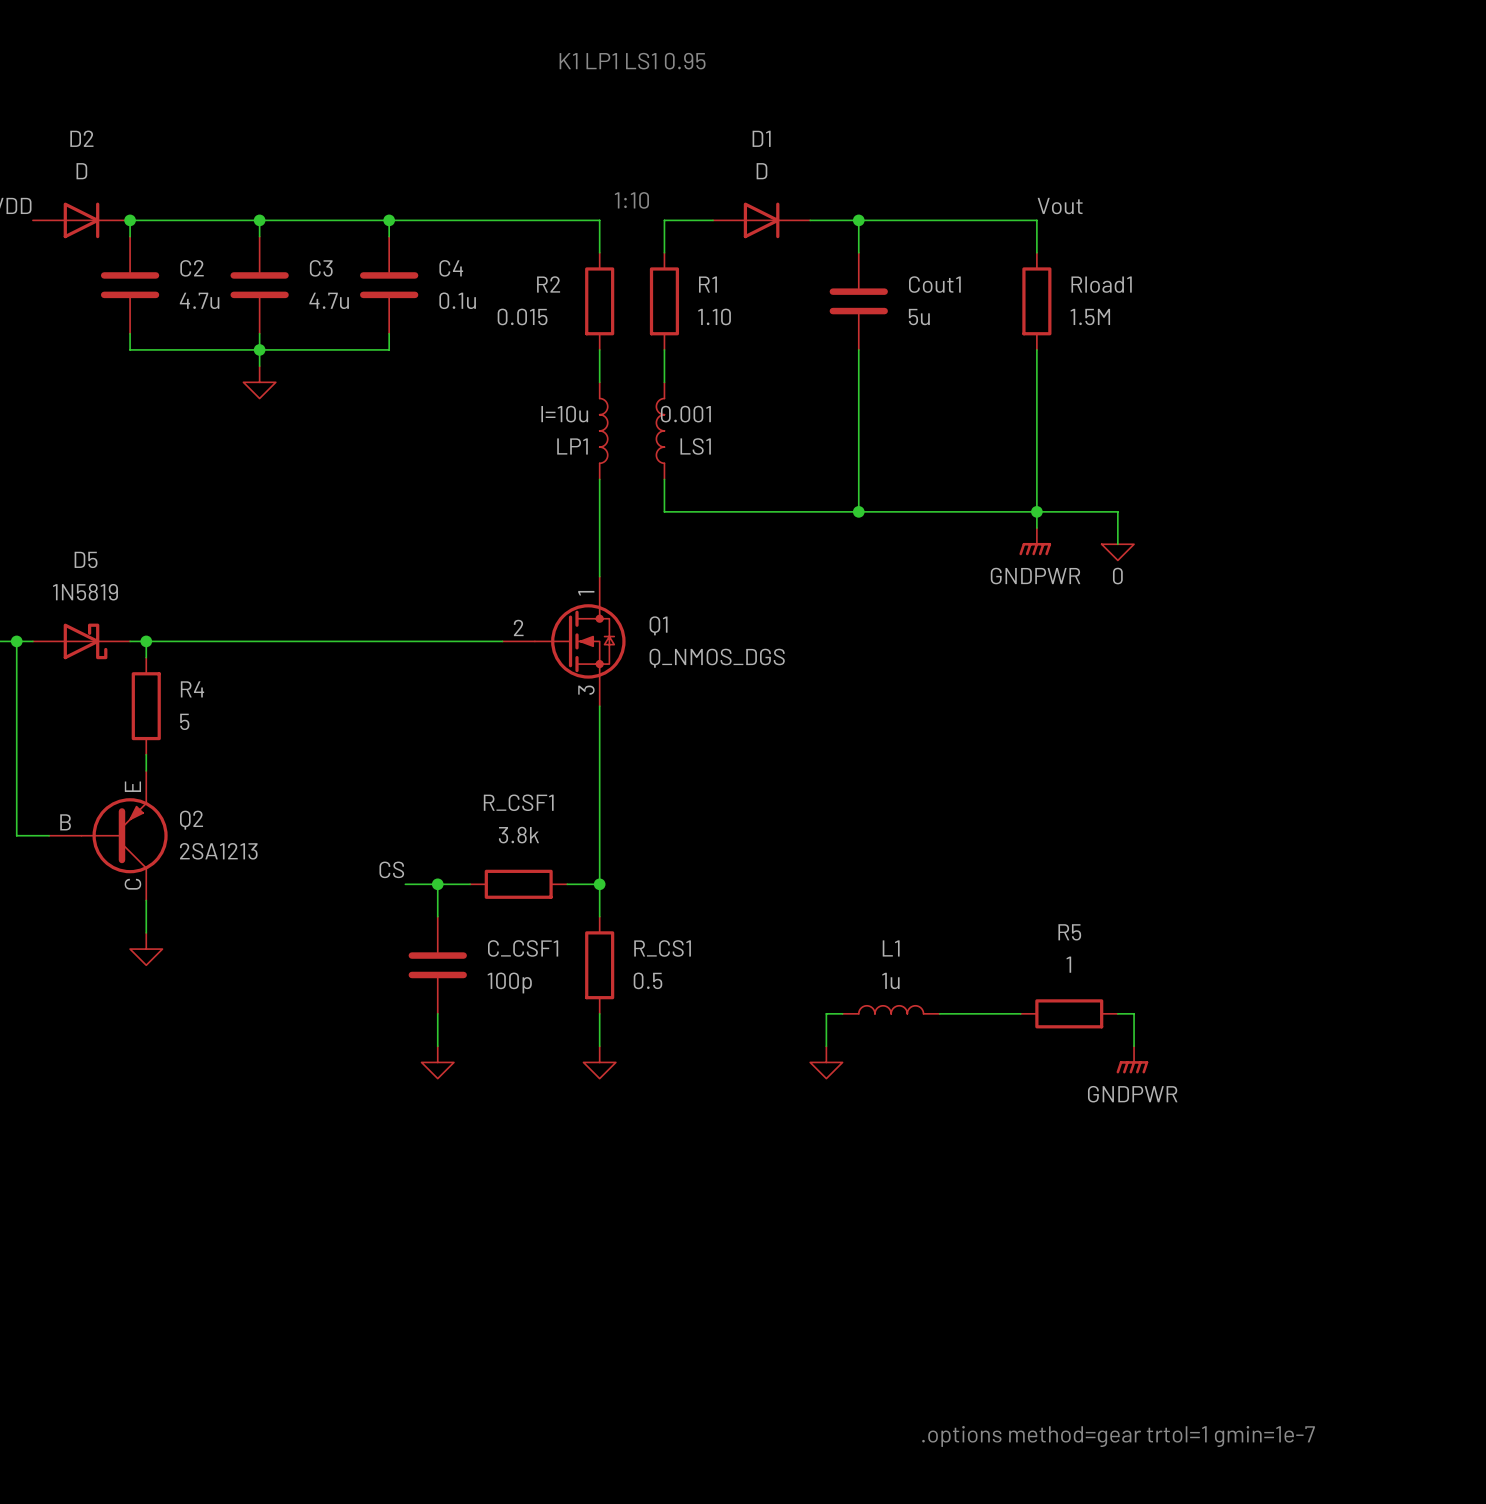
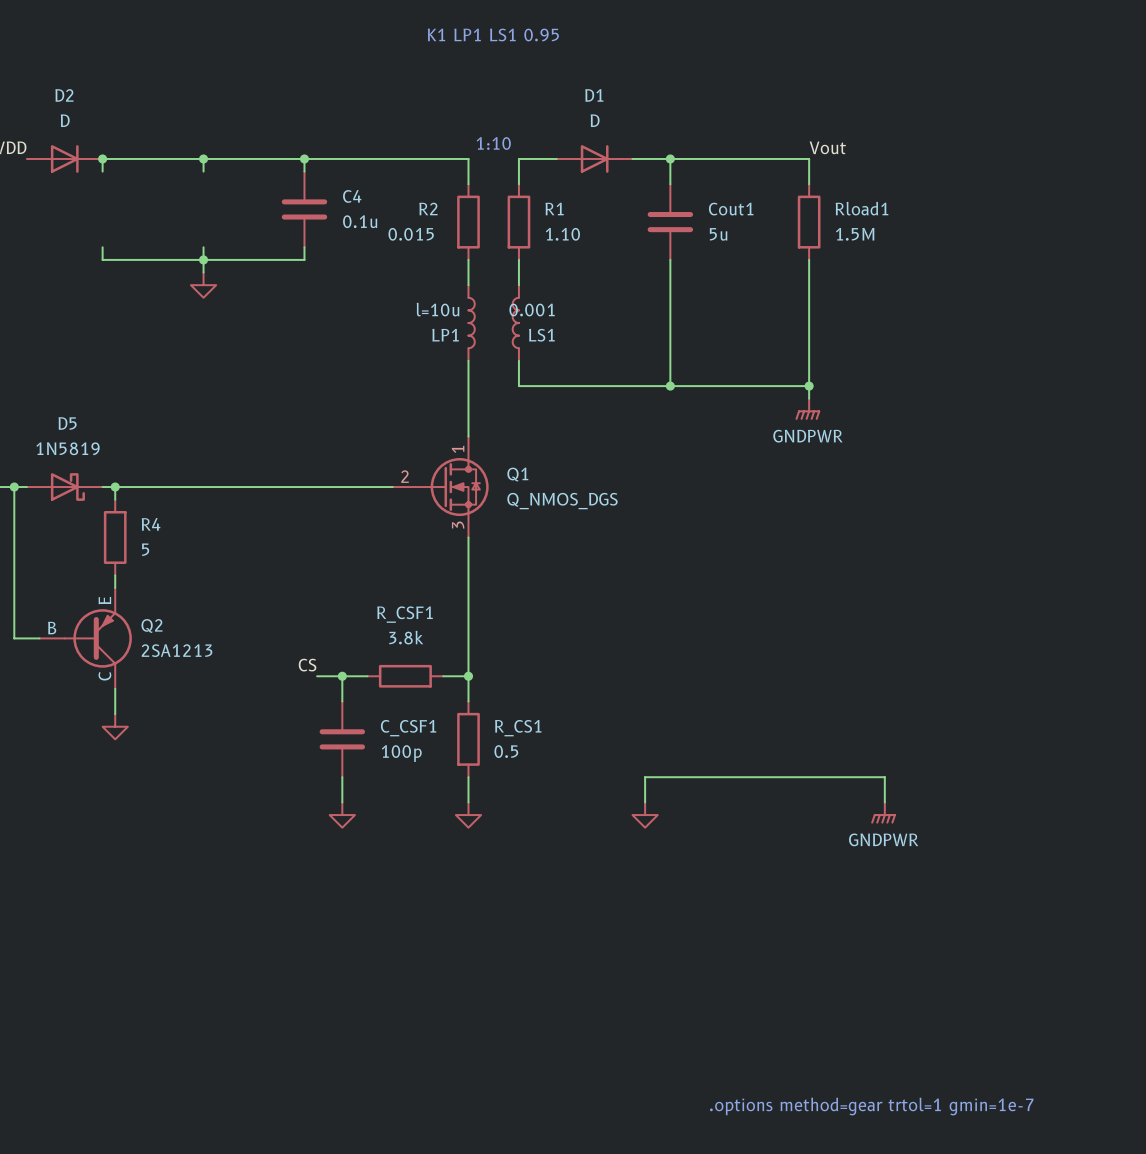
C2: 4.7u (130, 285) -> none
C3: 4.7u (259, 285) -> none
wire: (1036, 511) (1117, 511) (1117, 544) -> none
power symbol: 0 (1117, 552) -> none
L1: 1u (891, 1009) -> none
wire: none -> (657, 777) (733, 777)
wire: none -> (796, 777) (872, 777)
R5: 1 (1069, 1013) -> none

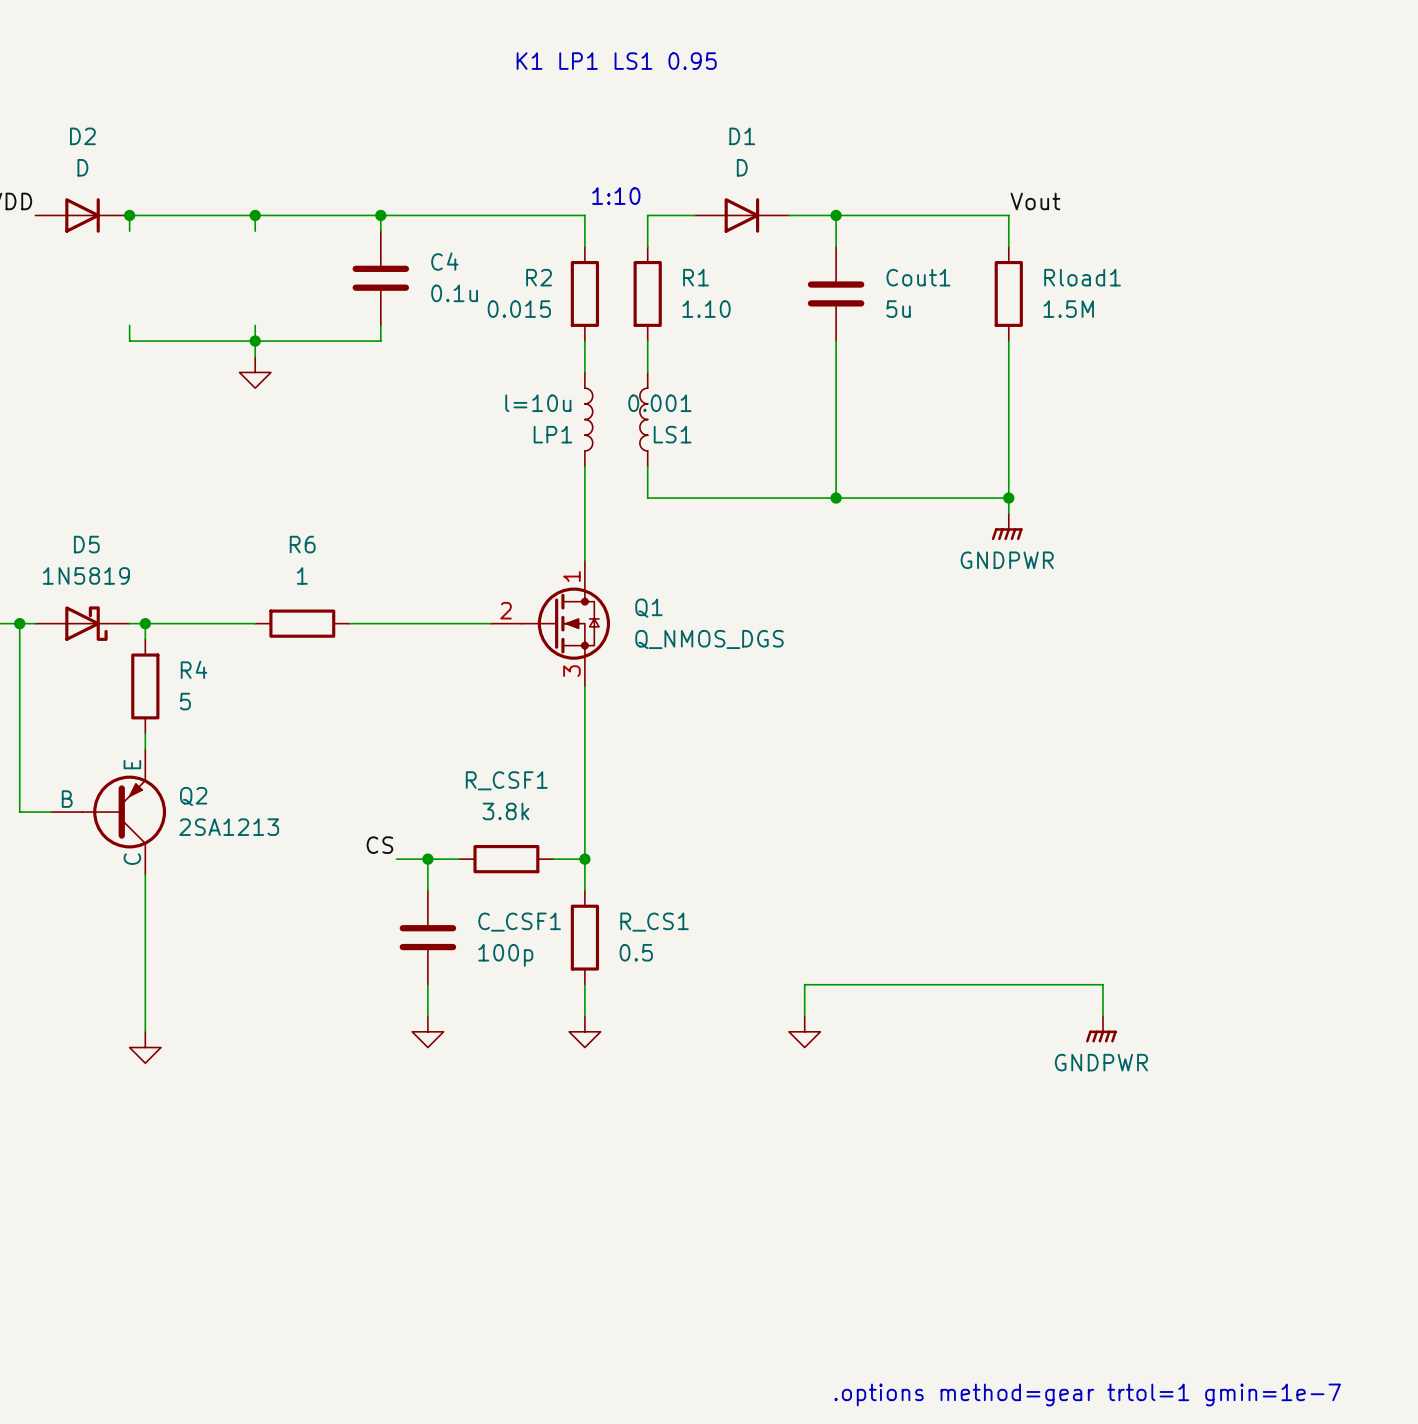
wire: (203, 487) (279, 487) -> none
R6: none -> 1 (302, 623)
wire: none -> (145, 906) (145, 1031)
power symbol position: (115, 726) -> (145, 1047)

